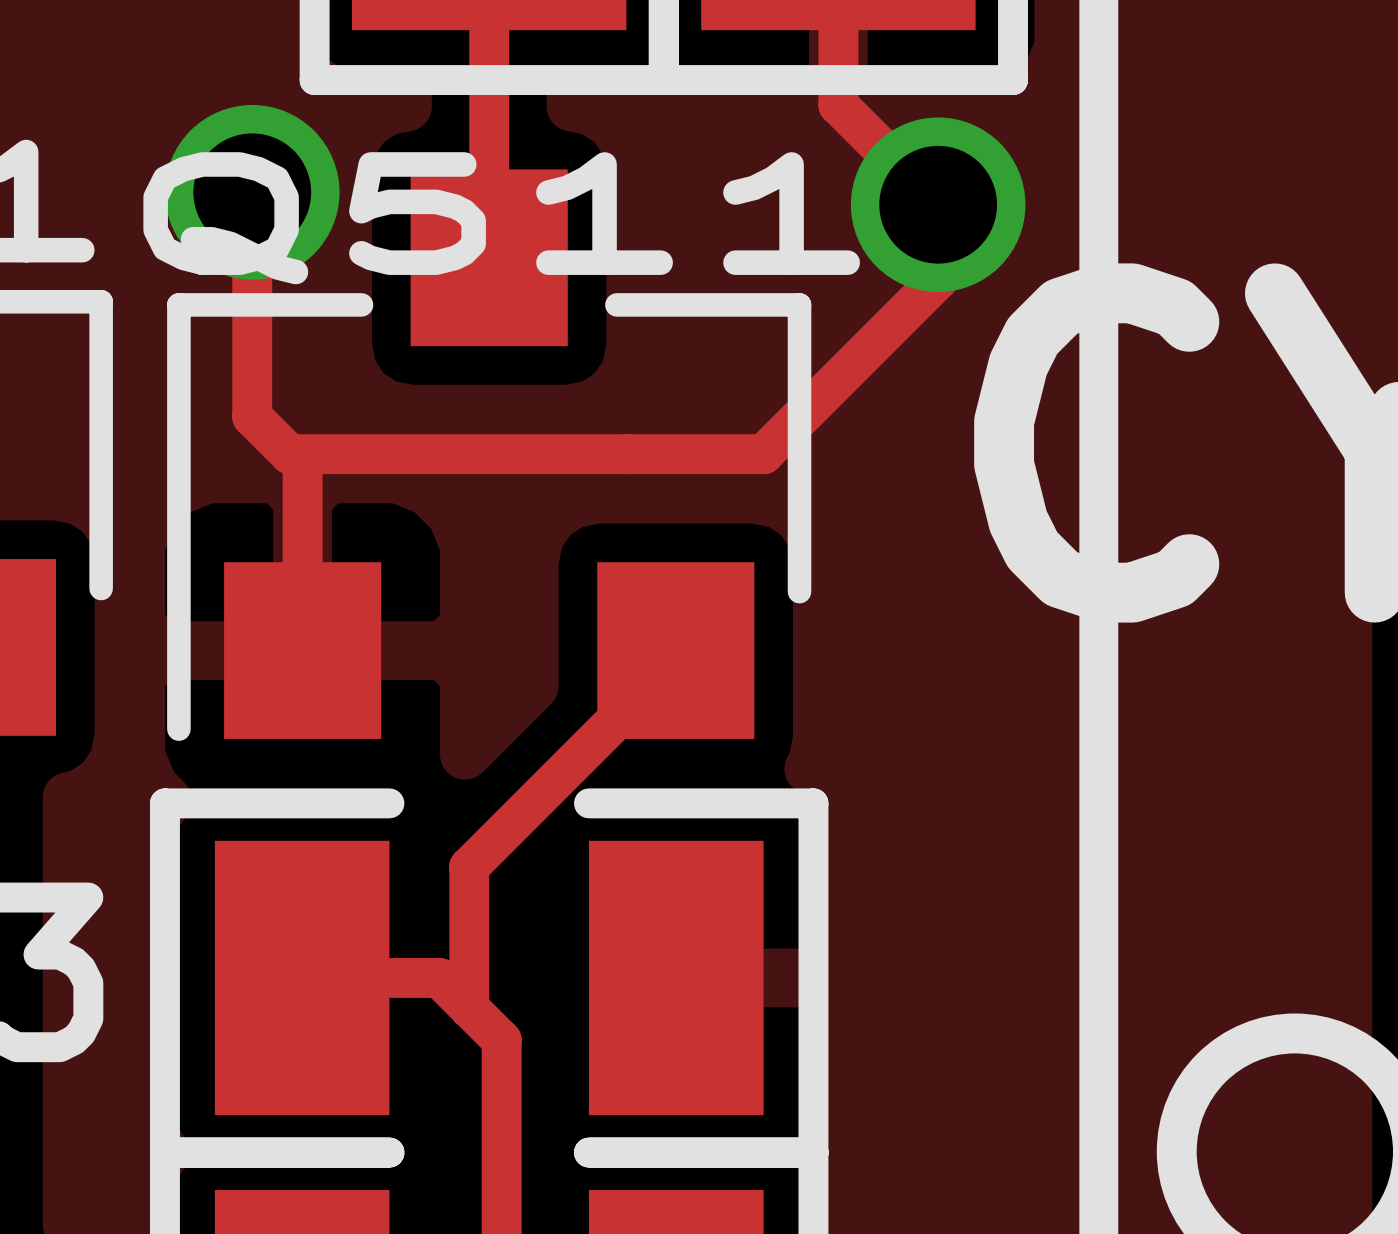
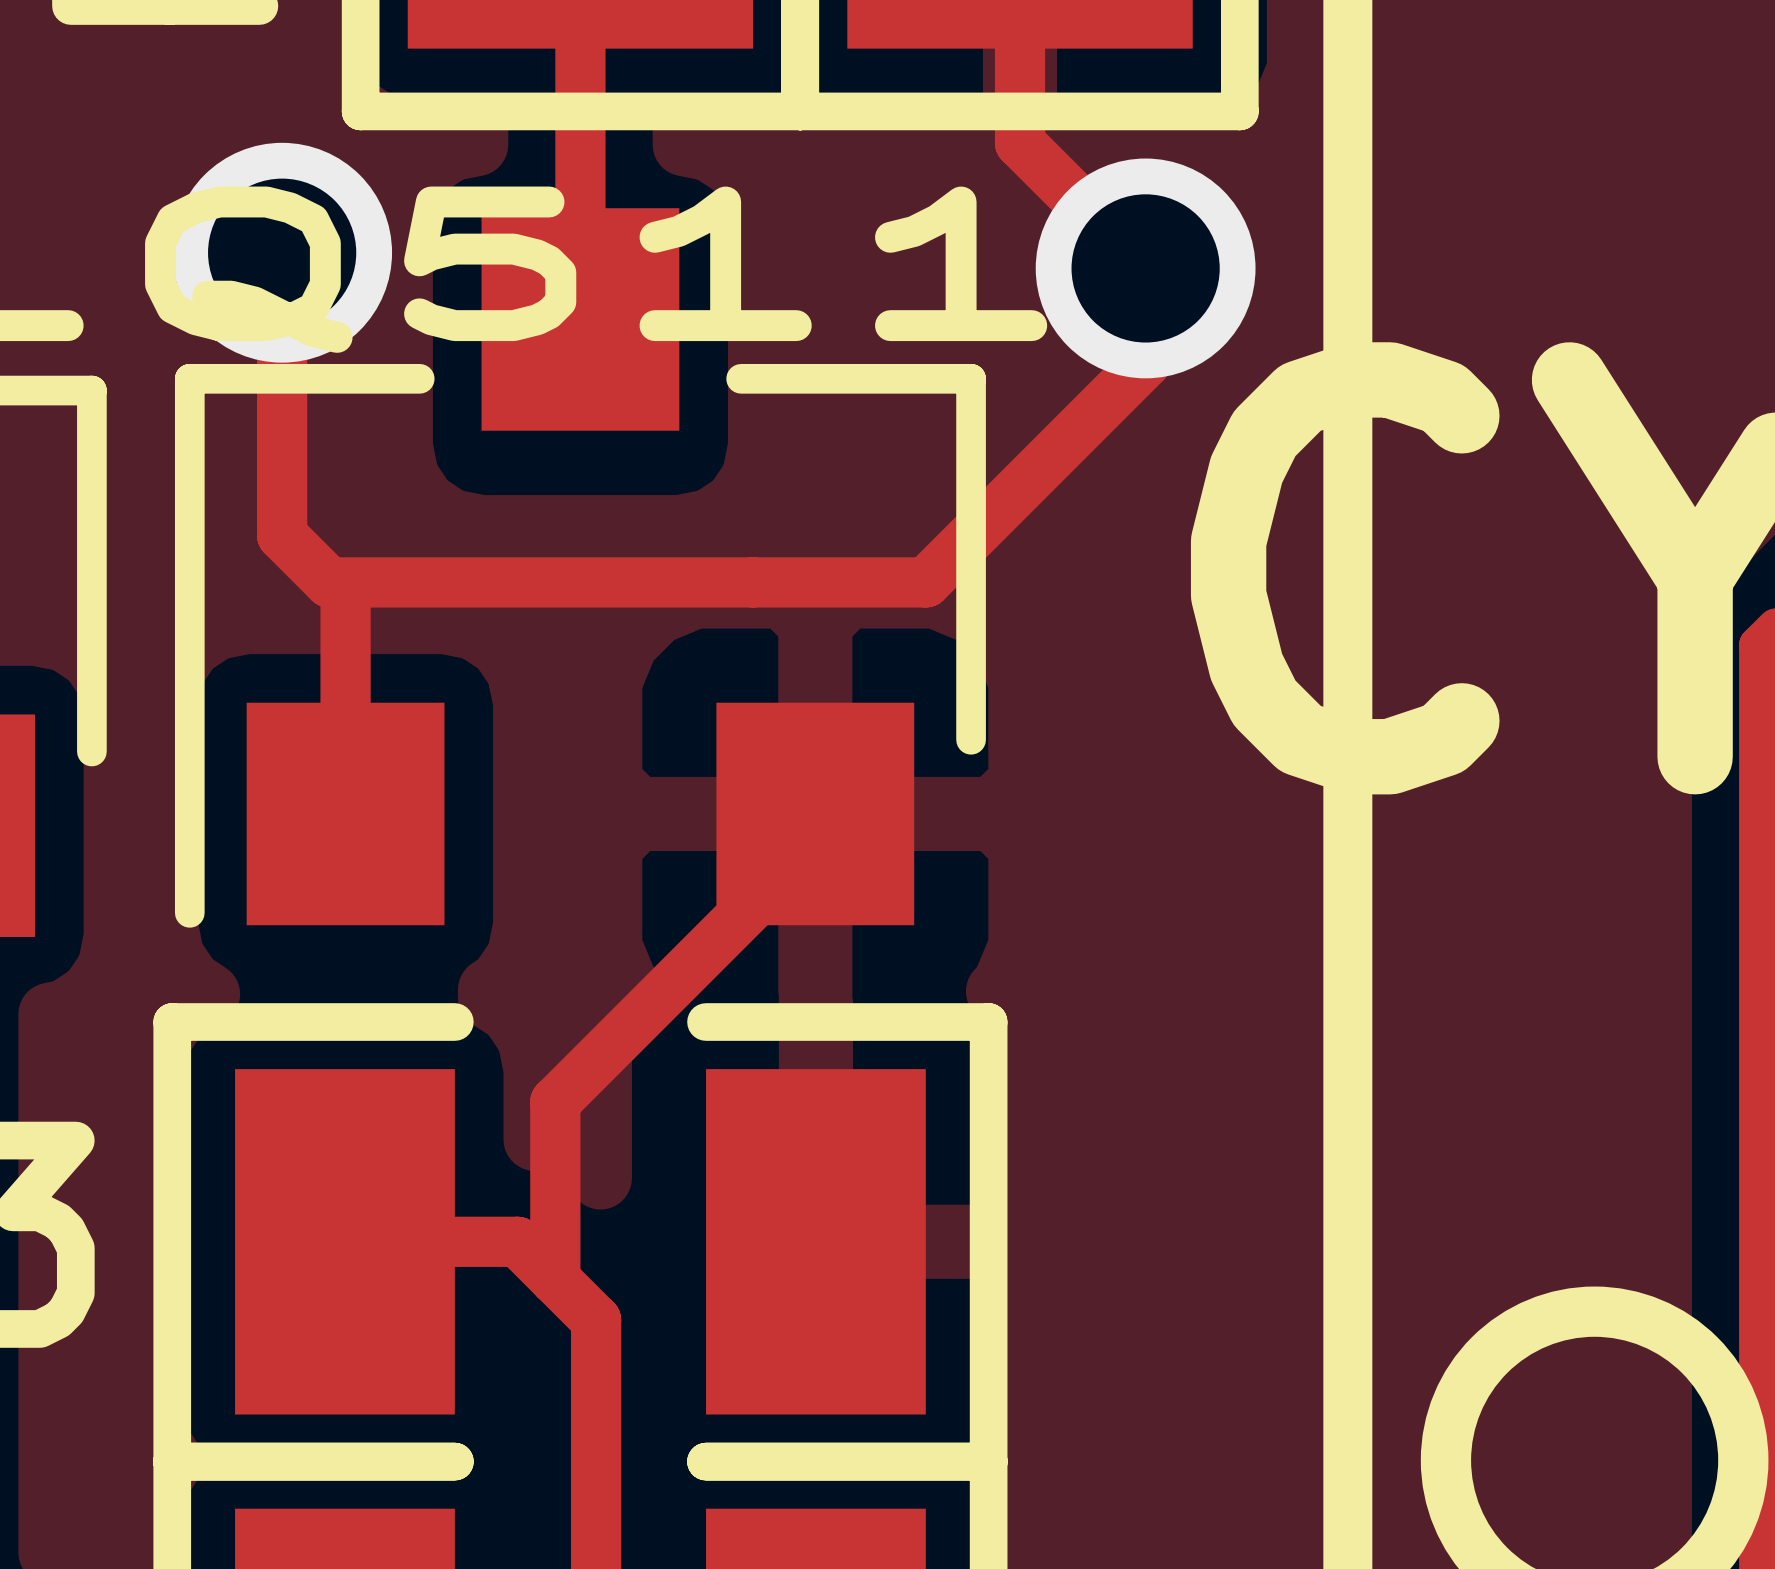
Q511 position: (489, 455) -> (580, 567)

